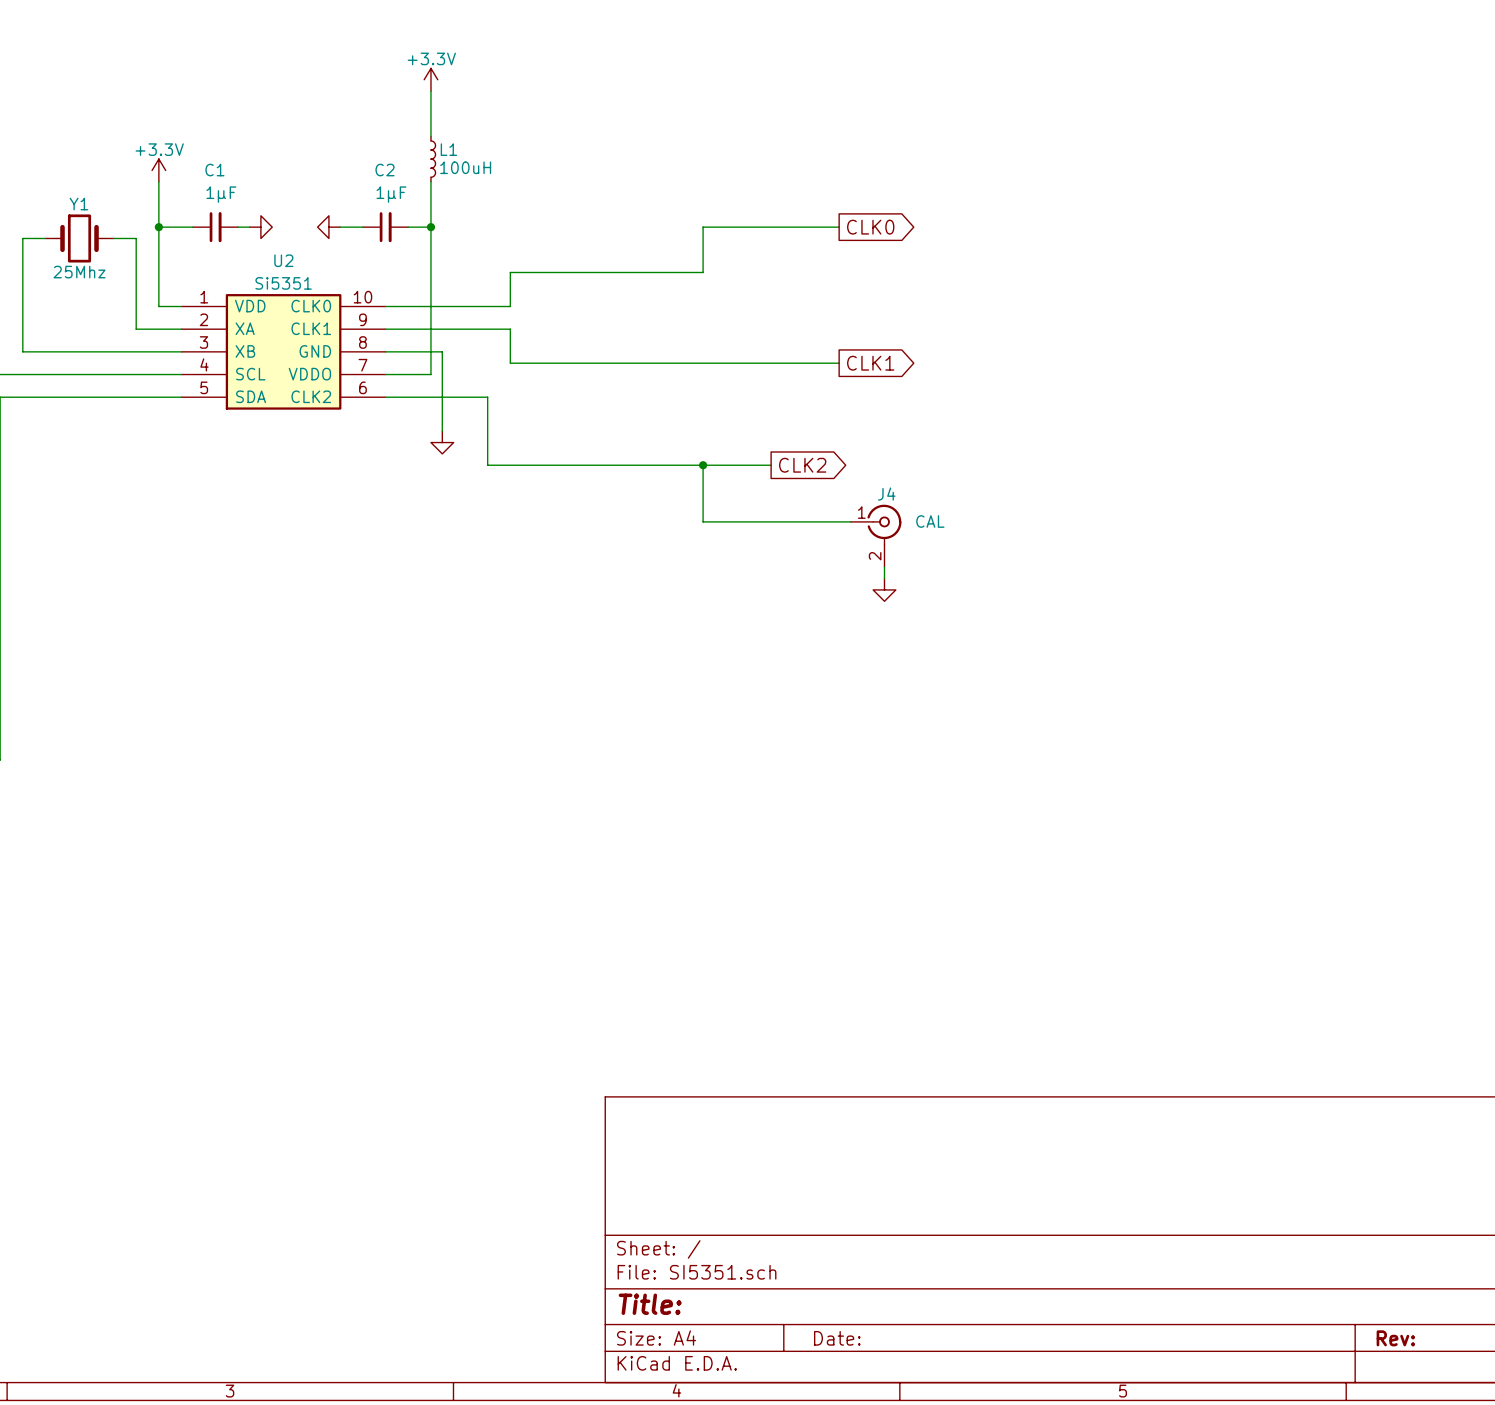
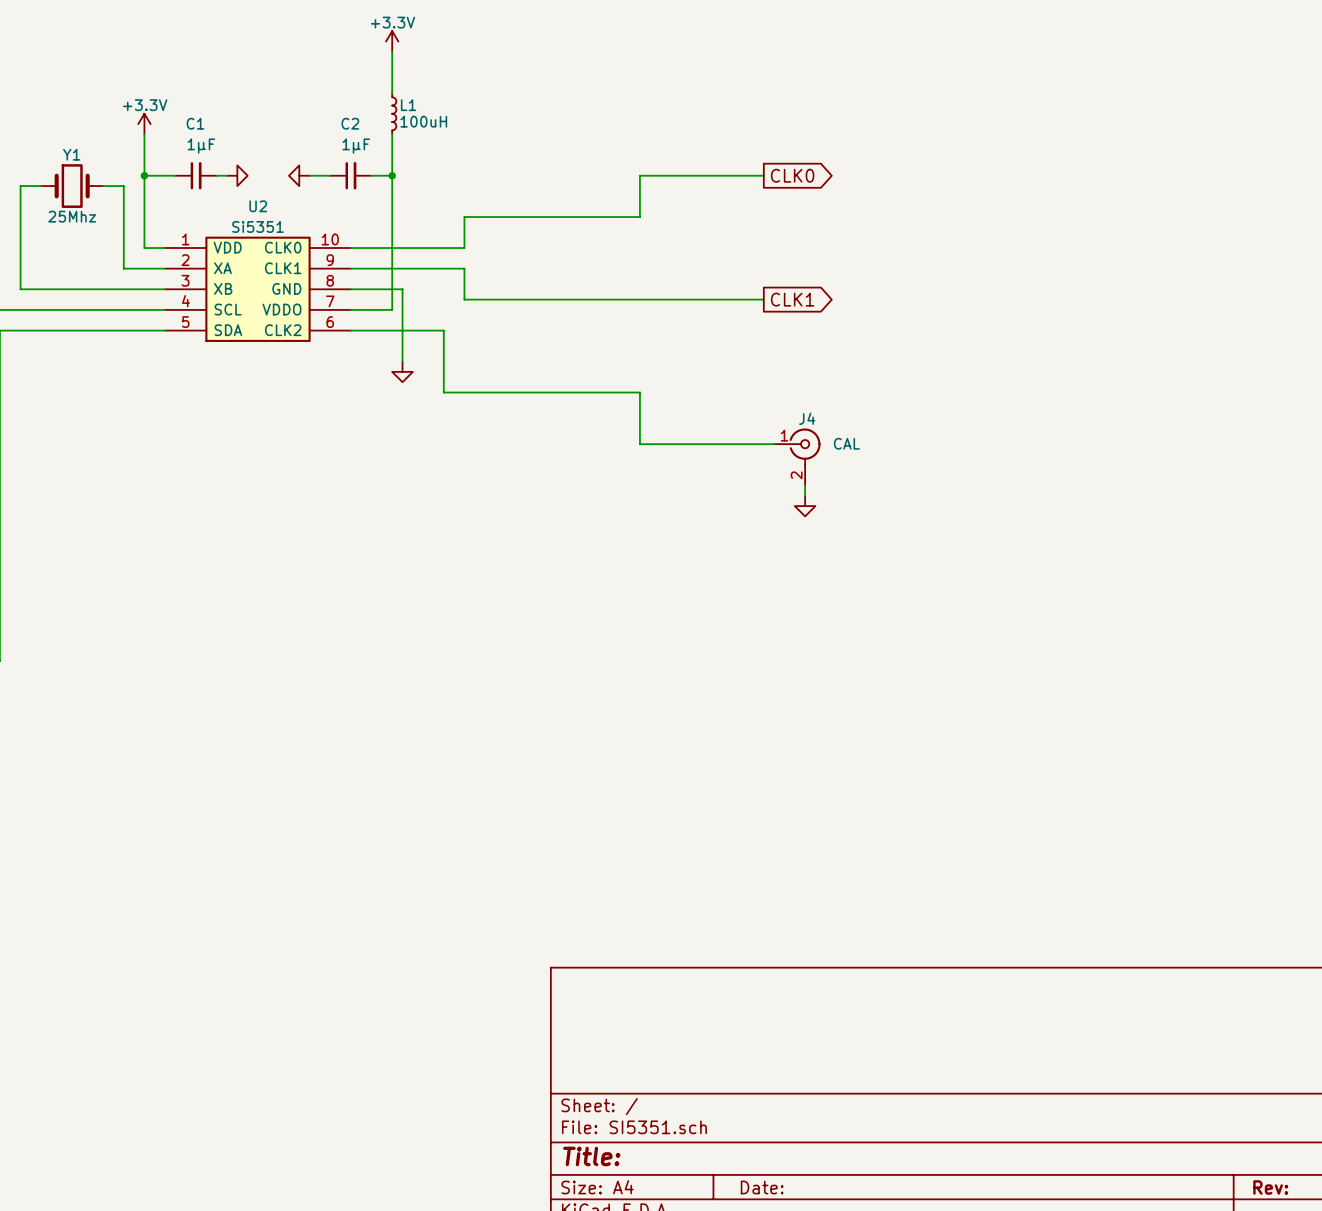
wire: (703, 465) (771, 465) -> none
junction: (703, 465) -> none
global label: CLK2 (802, 465) -> none

